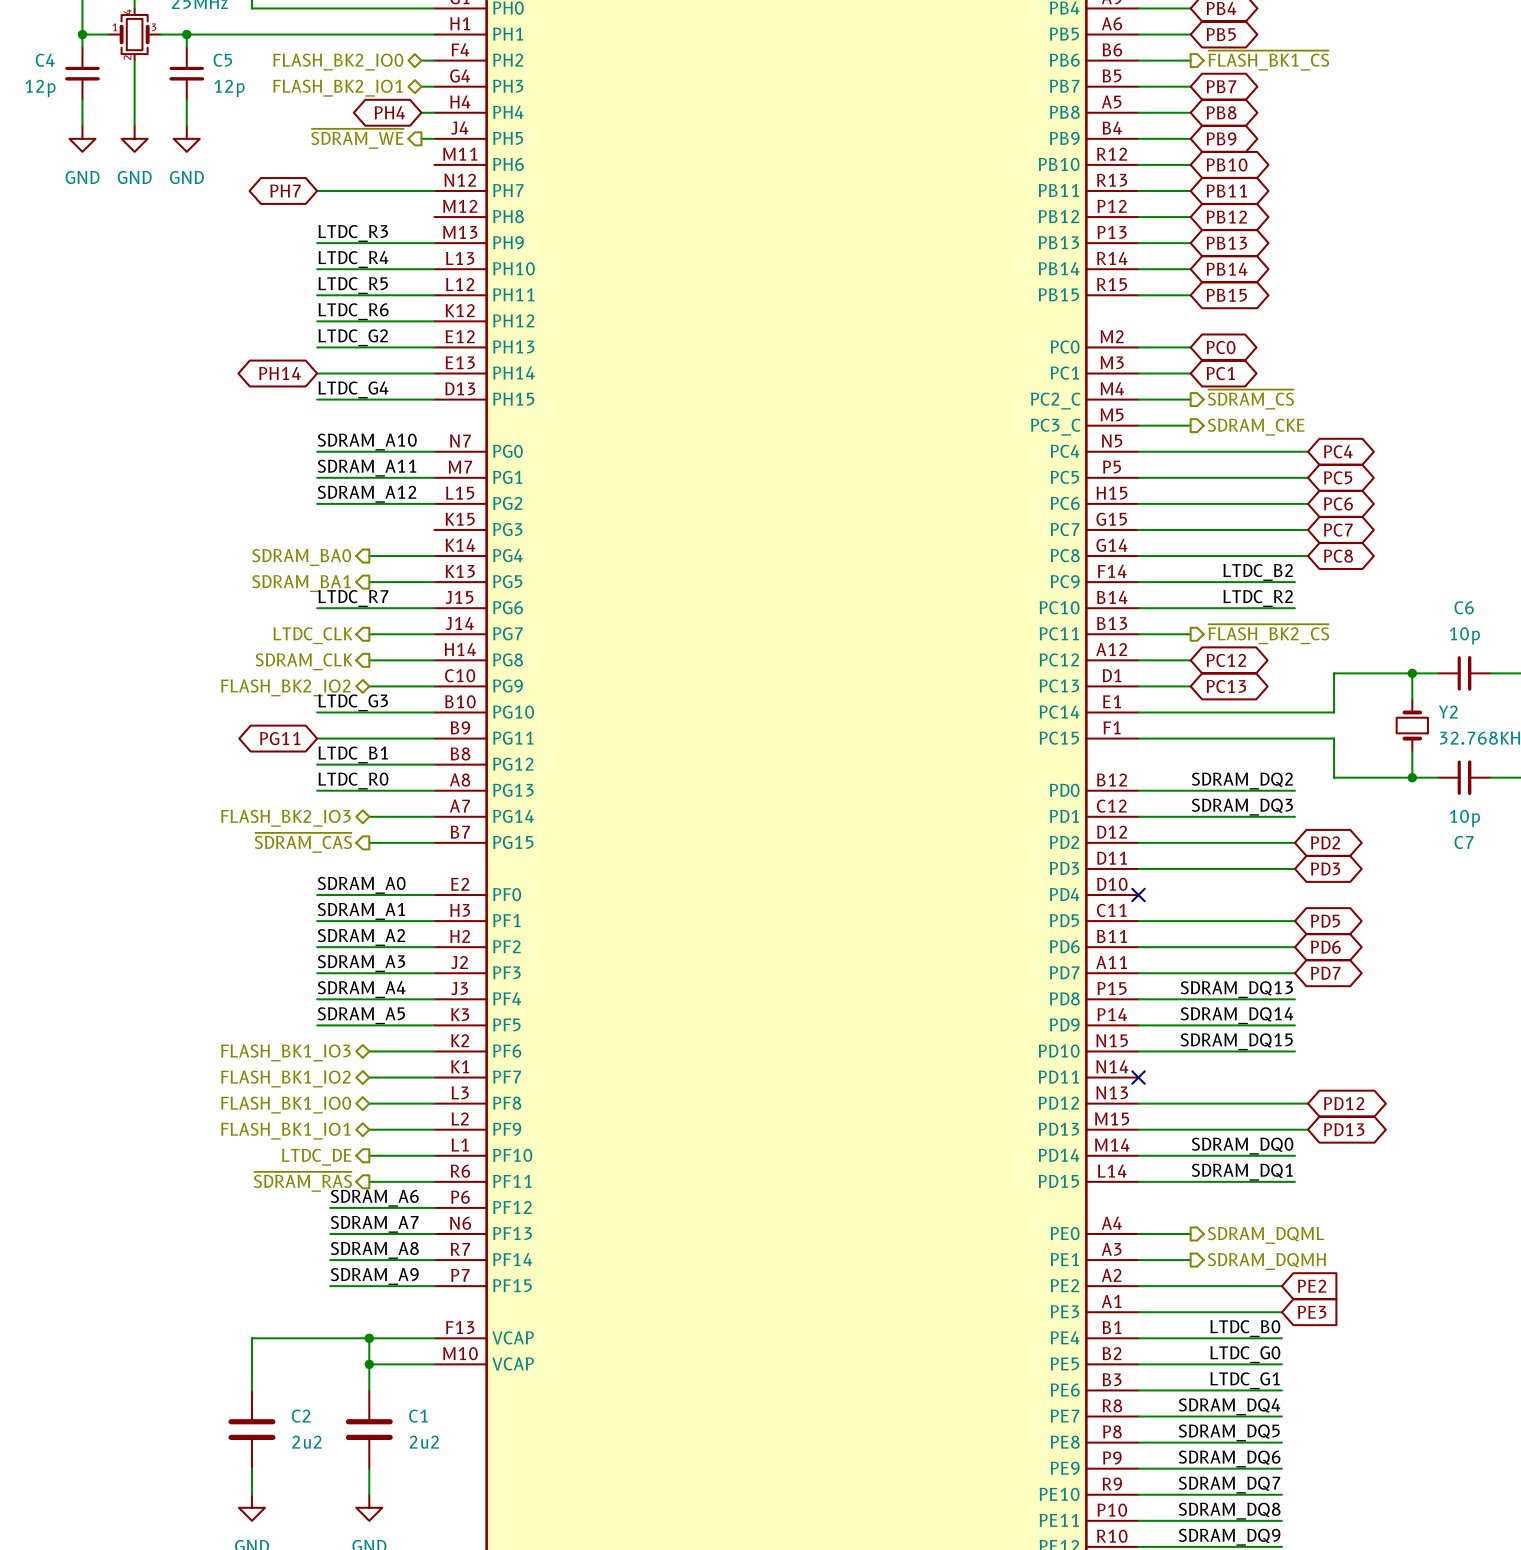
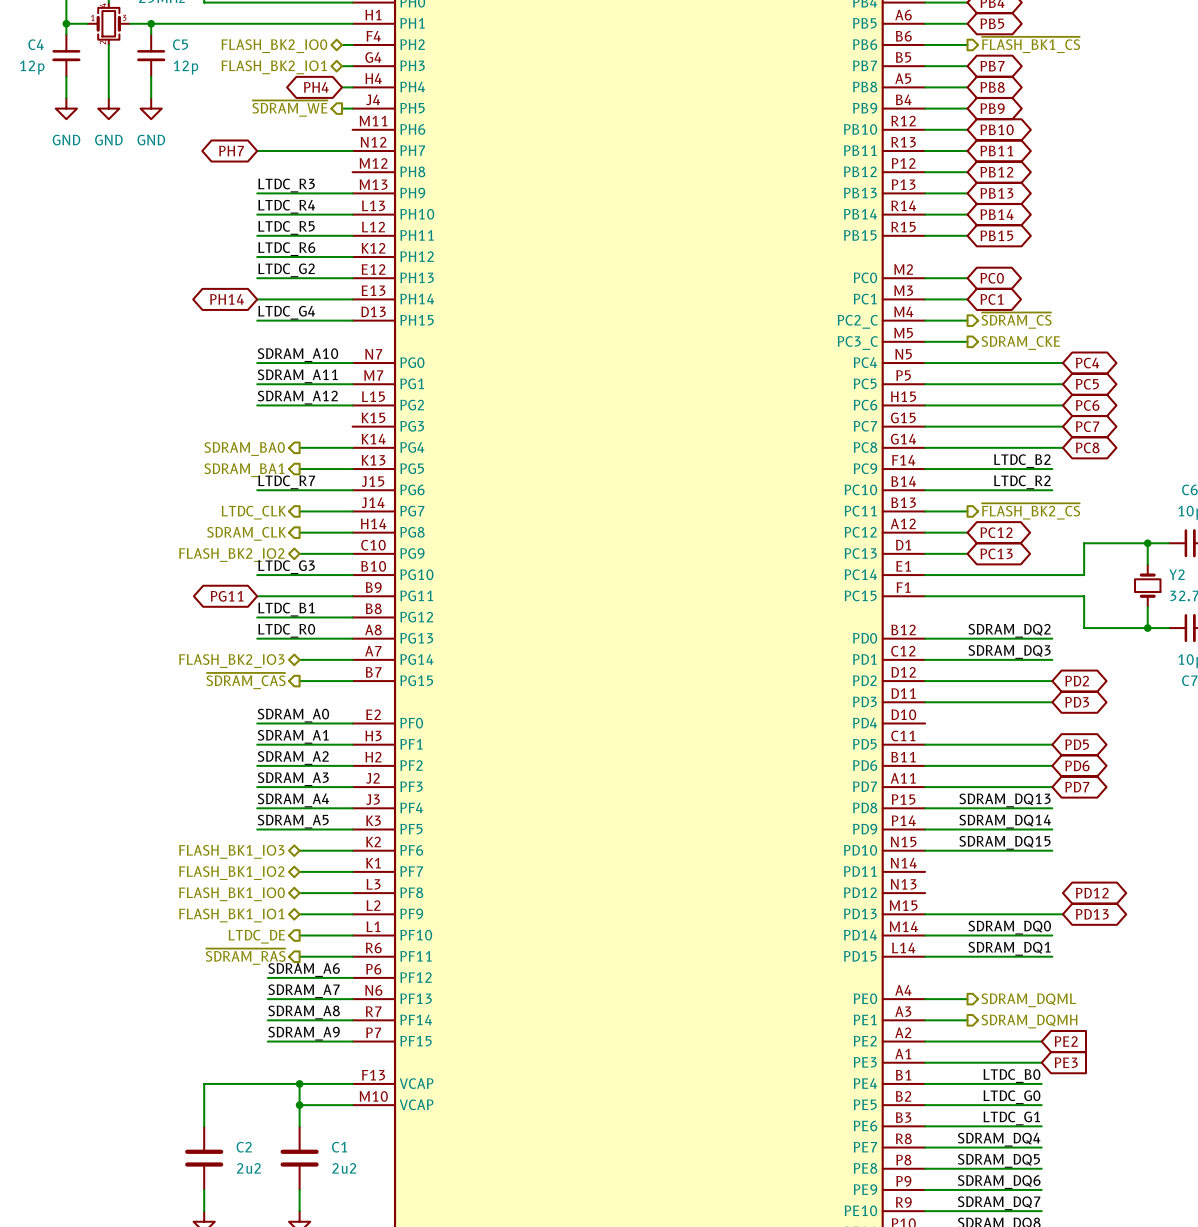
no-connect mark: (1138, 895) -> none
no-connect mark: (1138, 1077) -> none
wire: (1138, 1103) (1308, 1103) -> none

